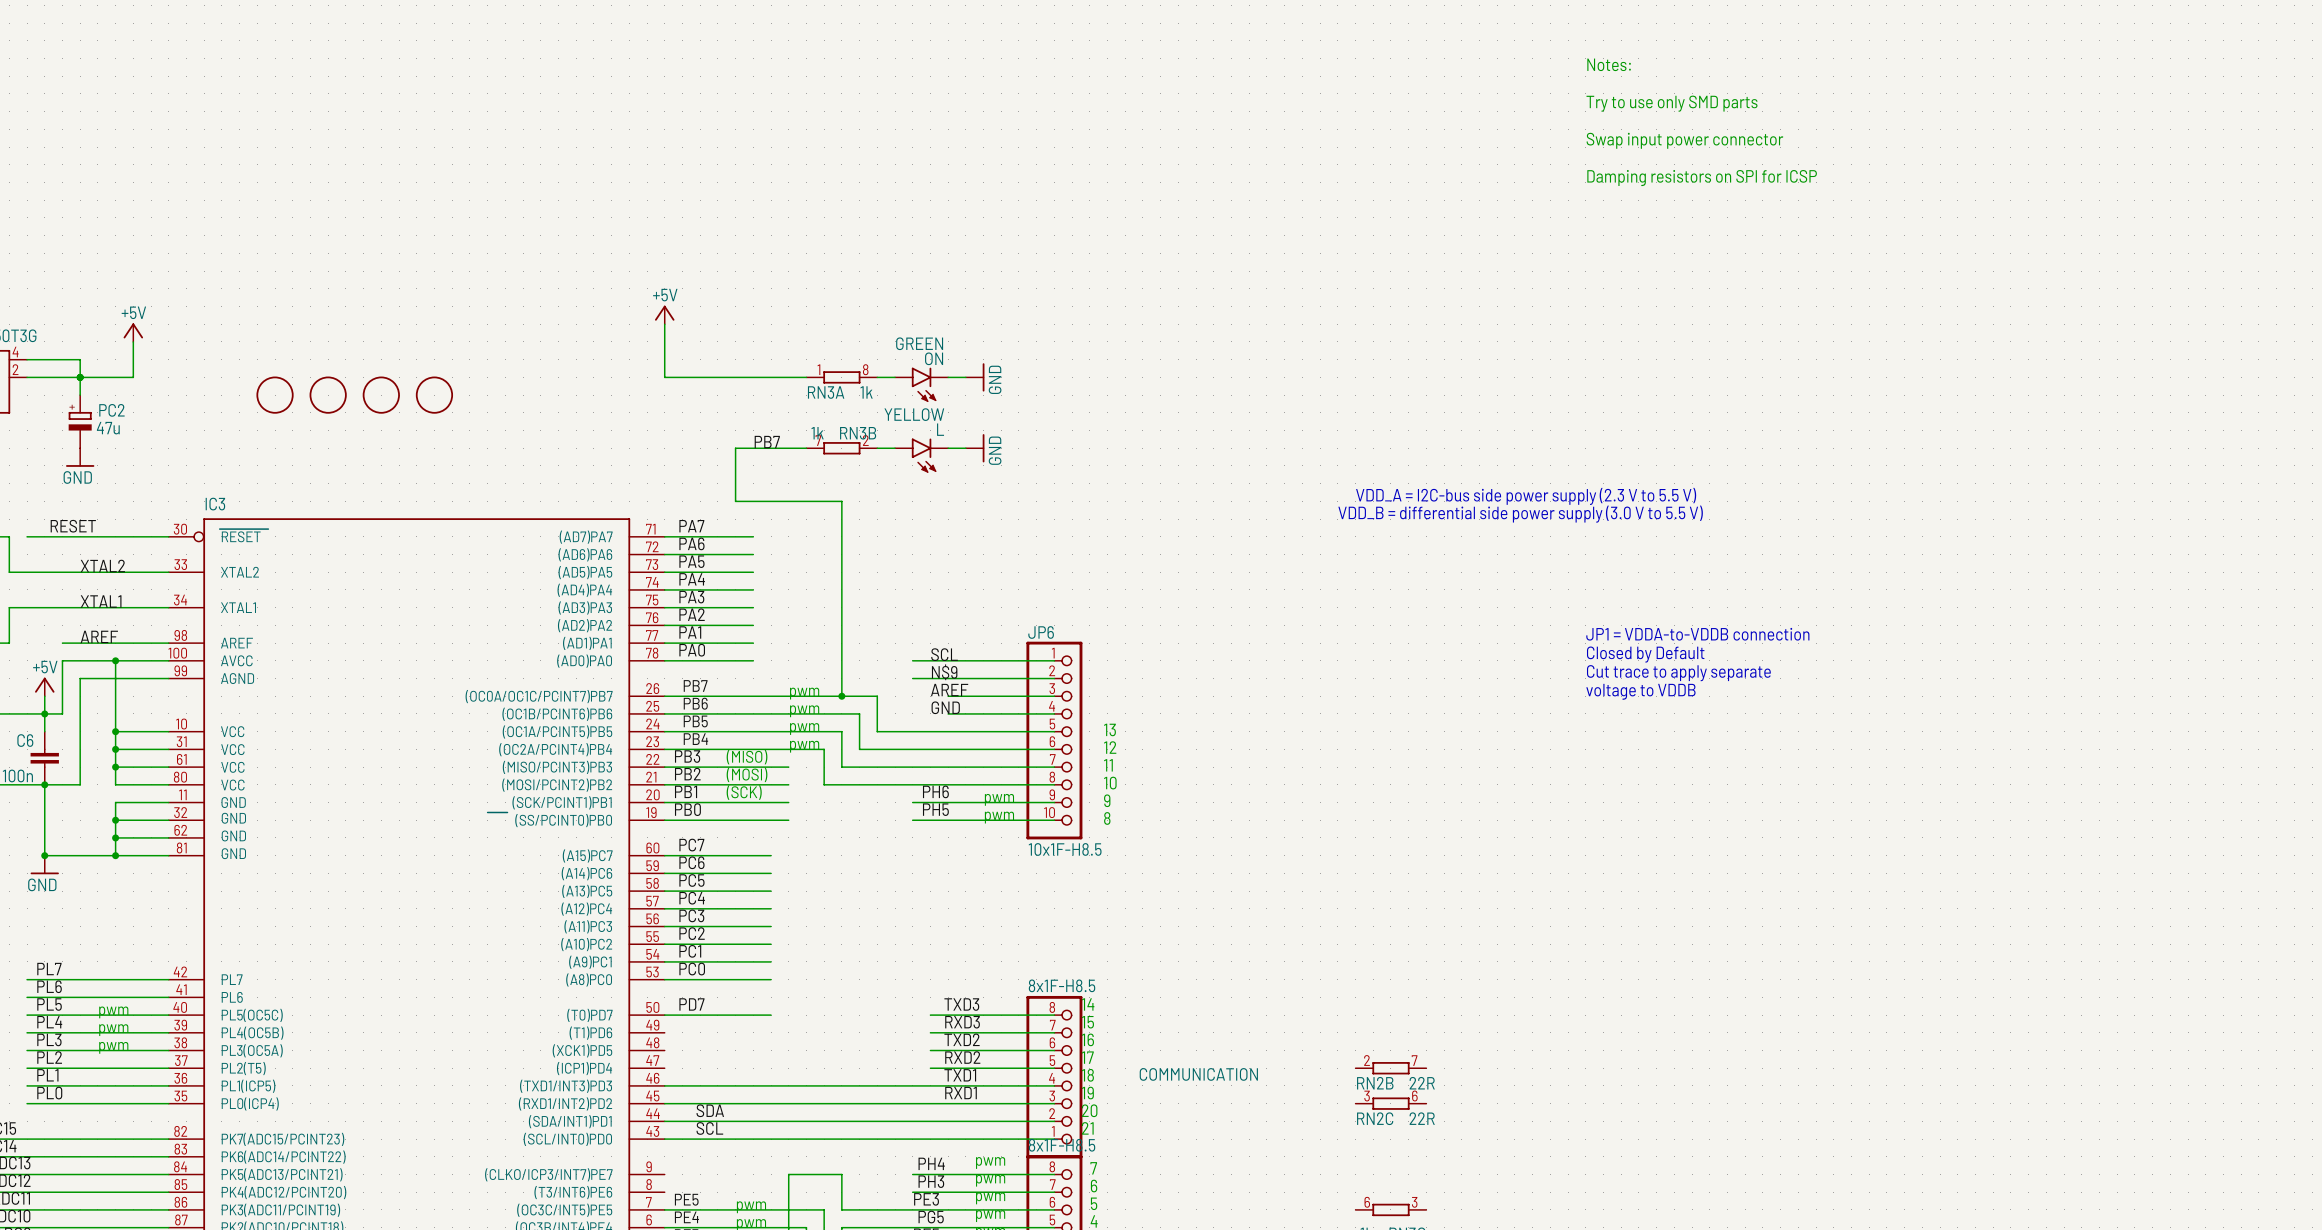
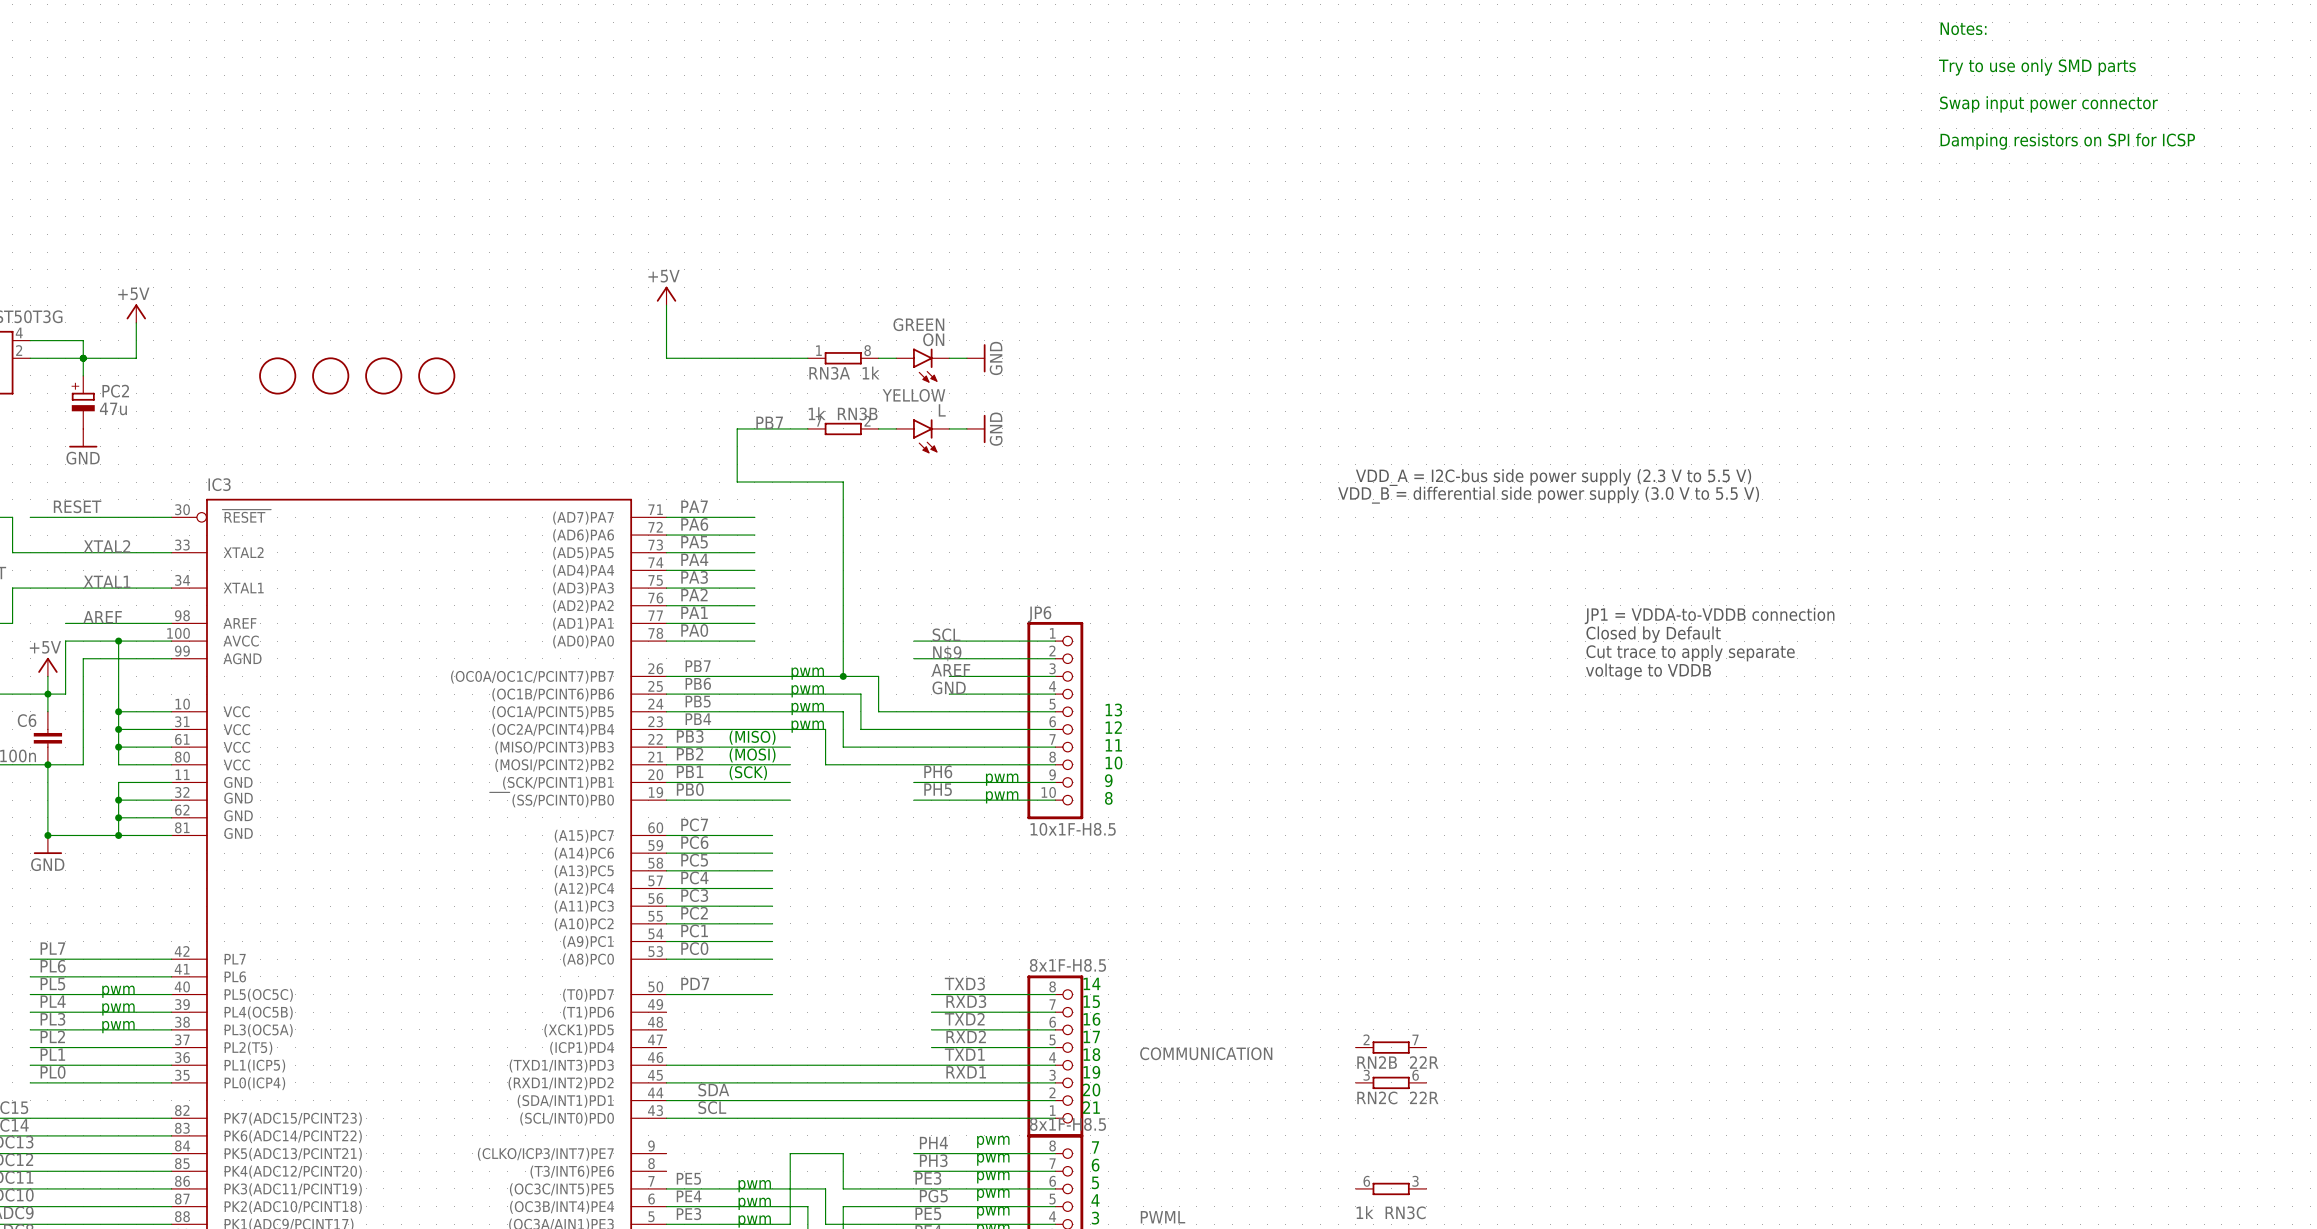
text: none -> Notes: (1963, 28)
text: Notes: (1609, 64) -> none
text: none -> Try to use only SMD parts (2037, 67)
text: Try to use only SMD parts (1672, 103) -> none
text: none -> Swap input power connector (2048, 104)
text: Swap input power connector (1684, 140) -> none
text: none -> Damping resistors on SPI for ICSP (2067, 141)
text: Damping resistors on SPI for ICSP (1702, 178) -> none

